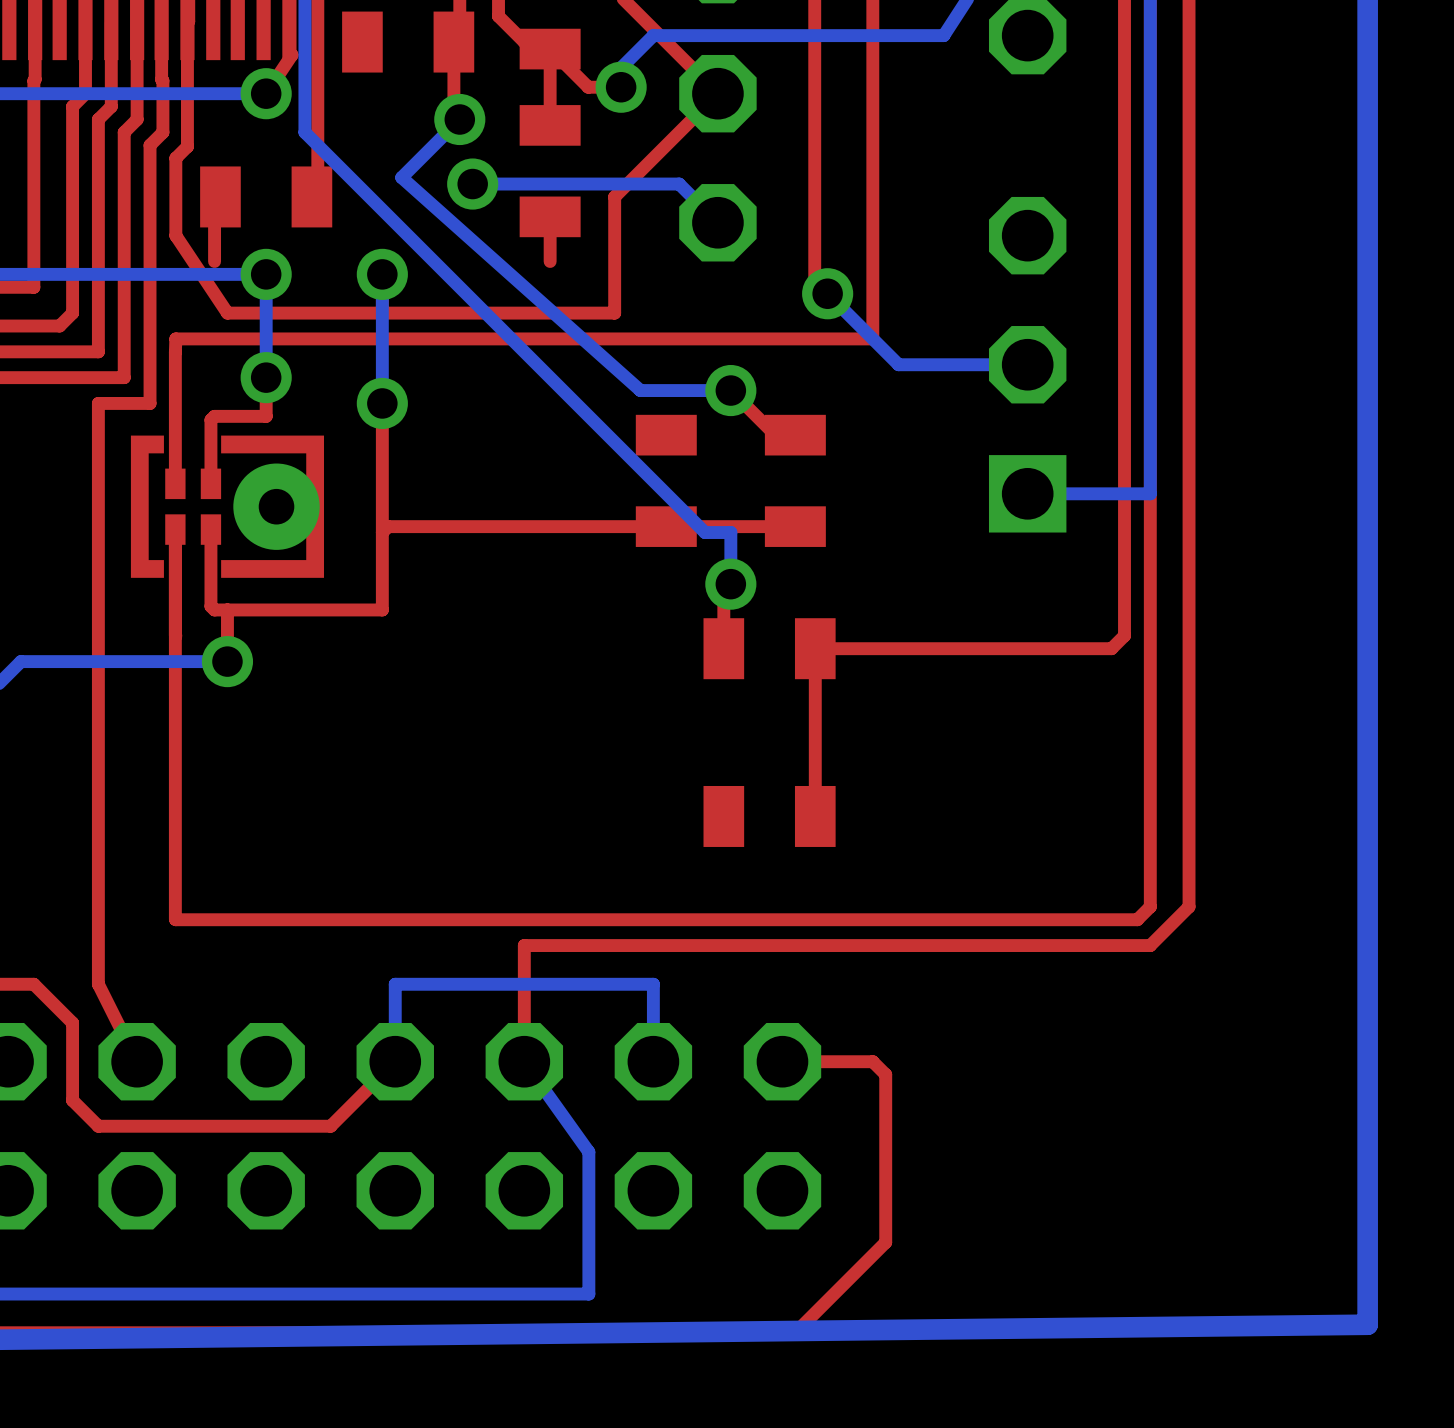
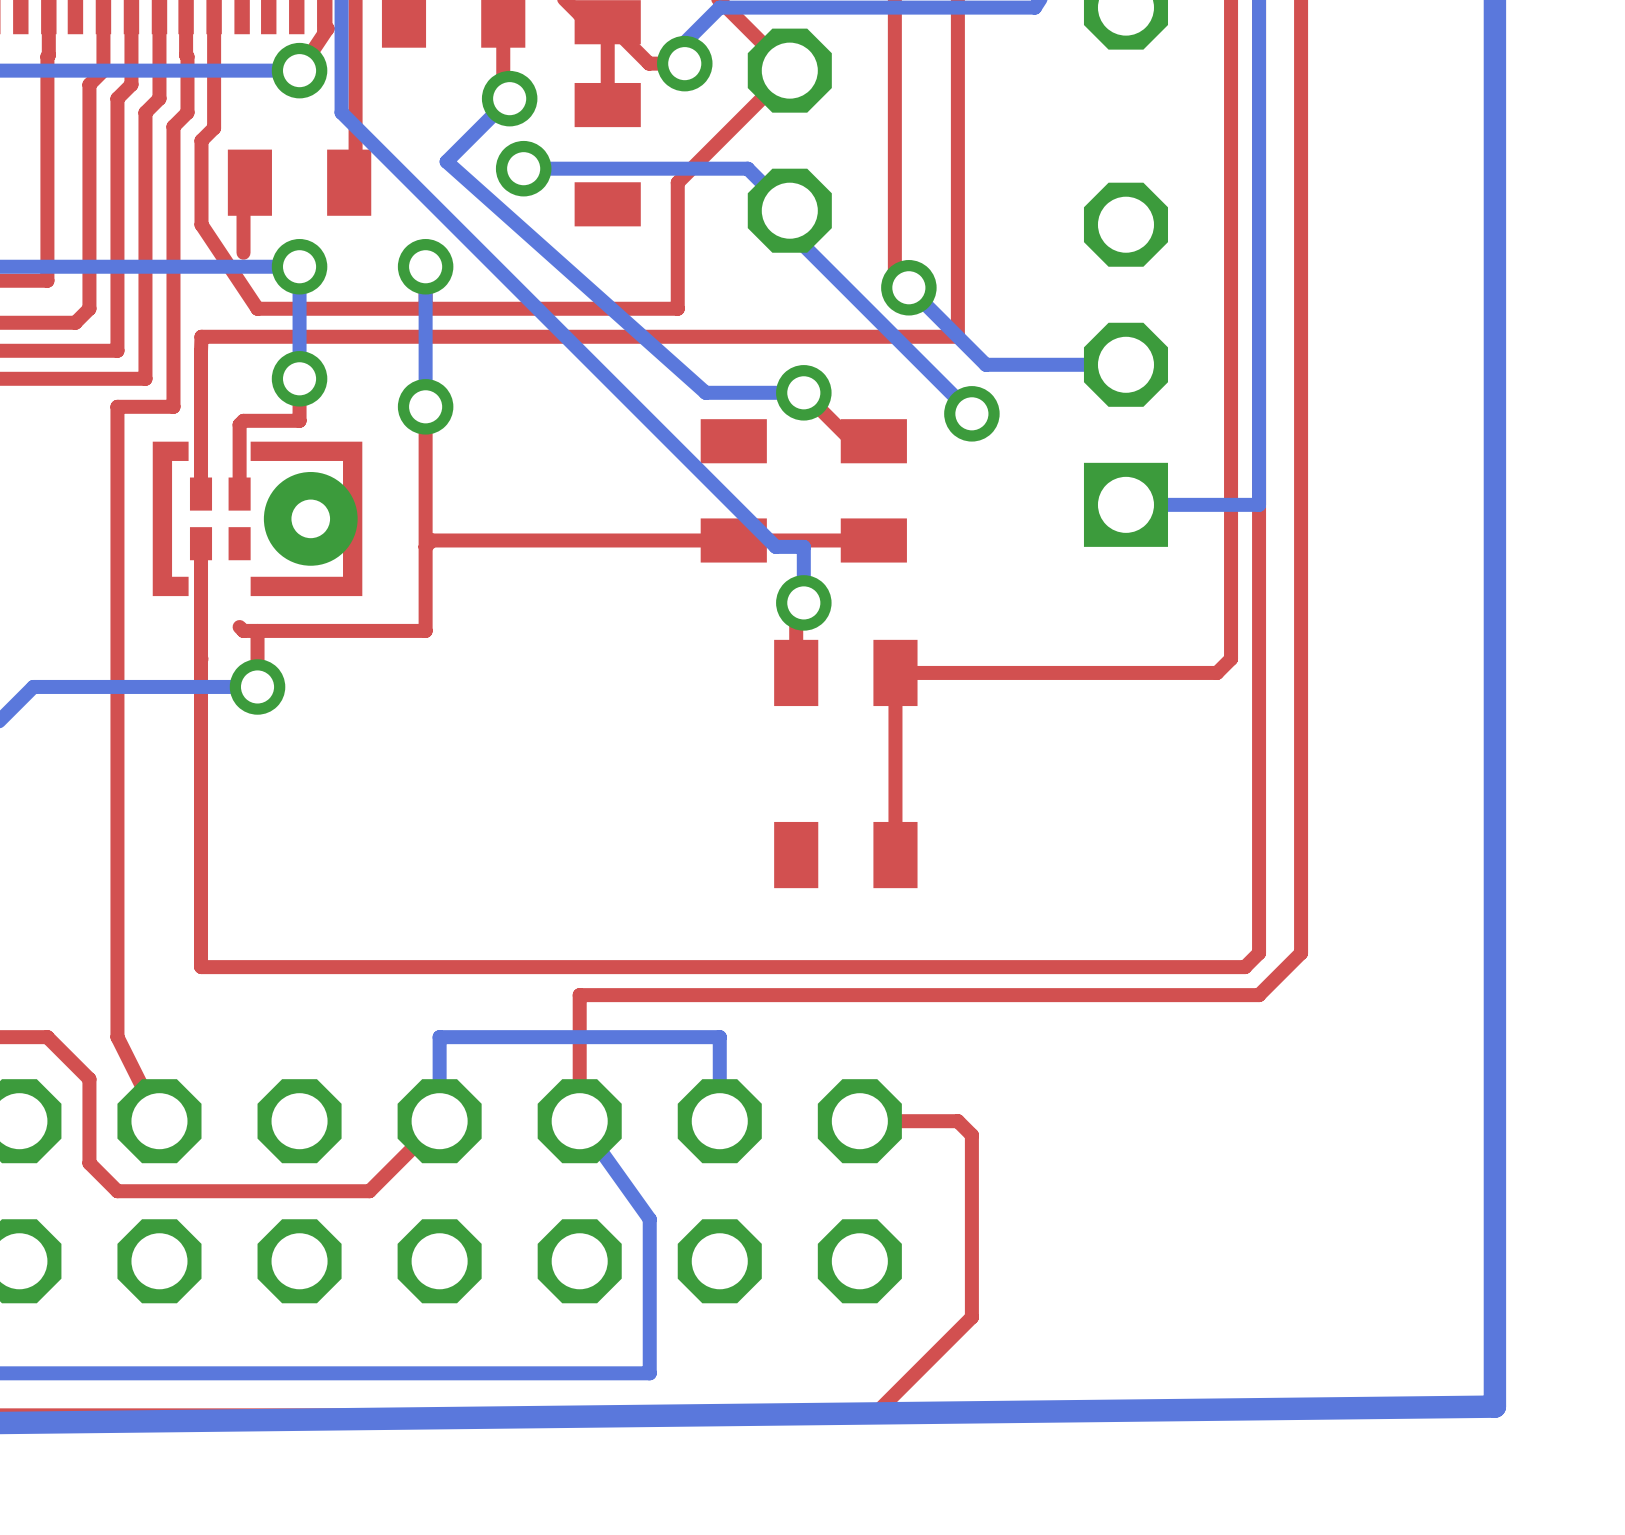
top track: (550, 216) (550, 261) -> none
bottom track: none -> (789, 210) (789, 231) (971, 413)
via: none -> (971, 413)
top track: (210, 529) (210, 606) -> none

